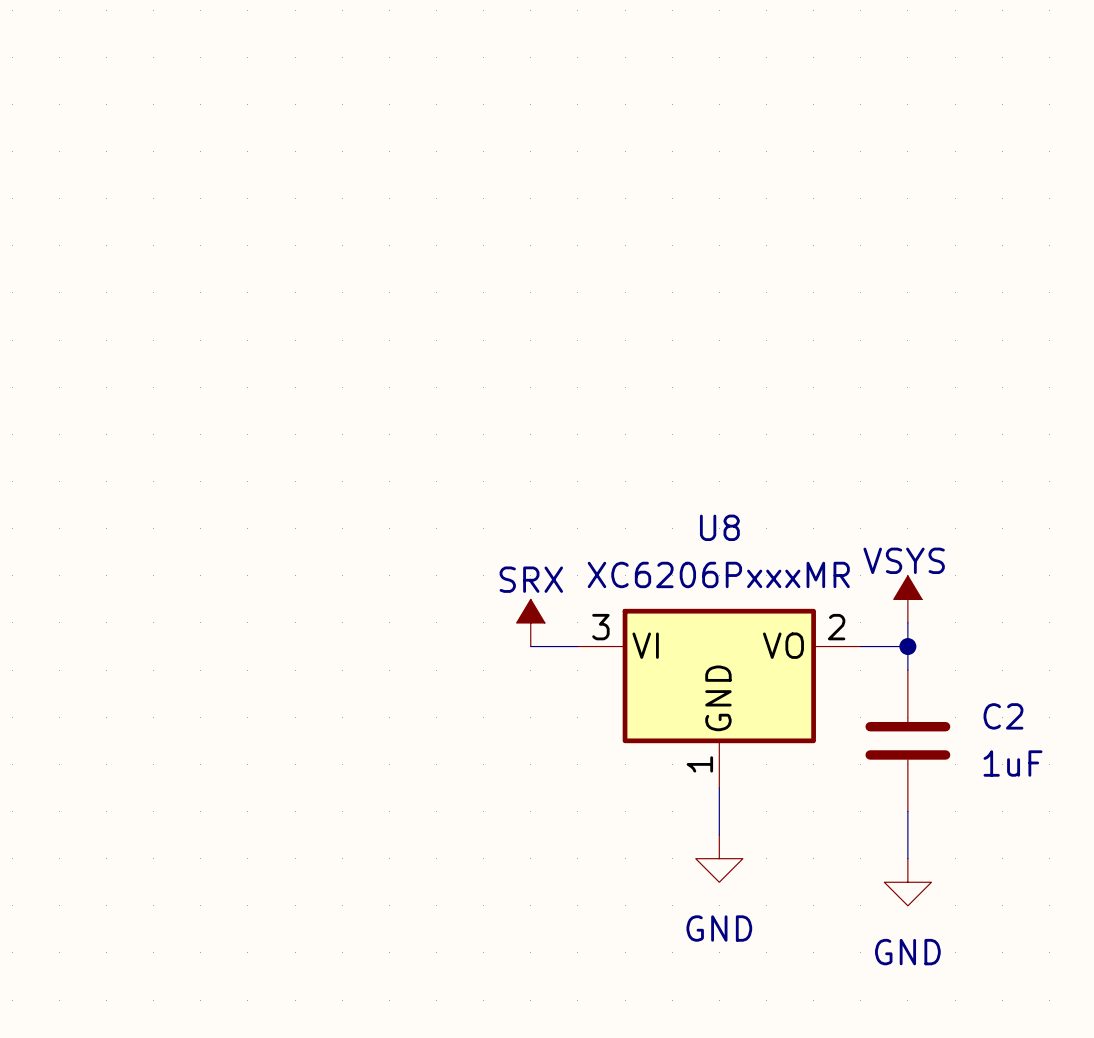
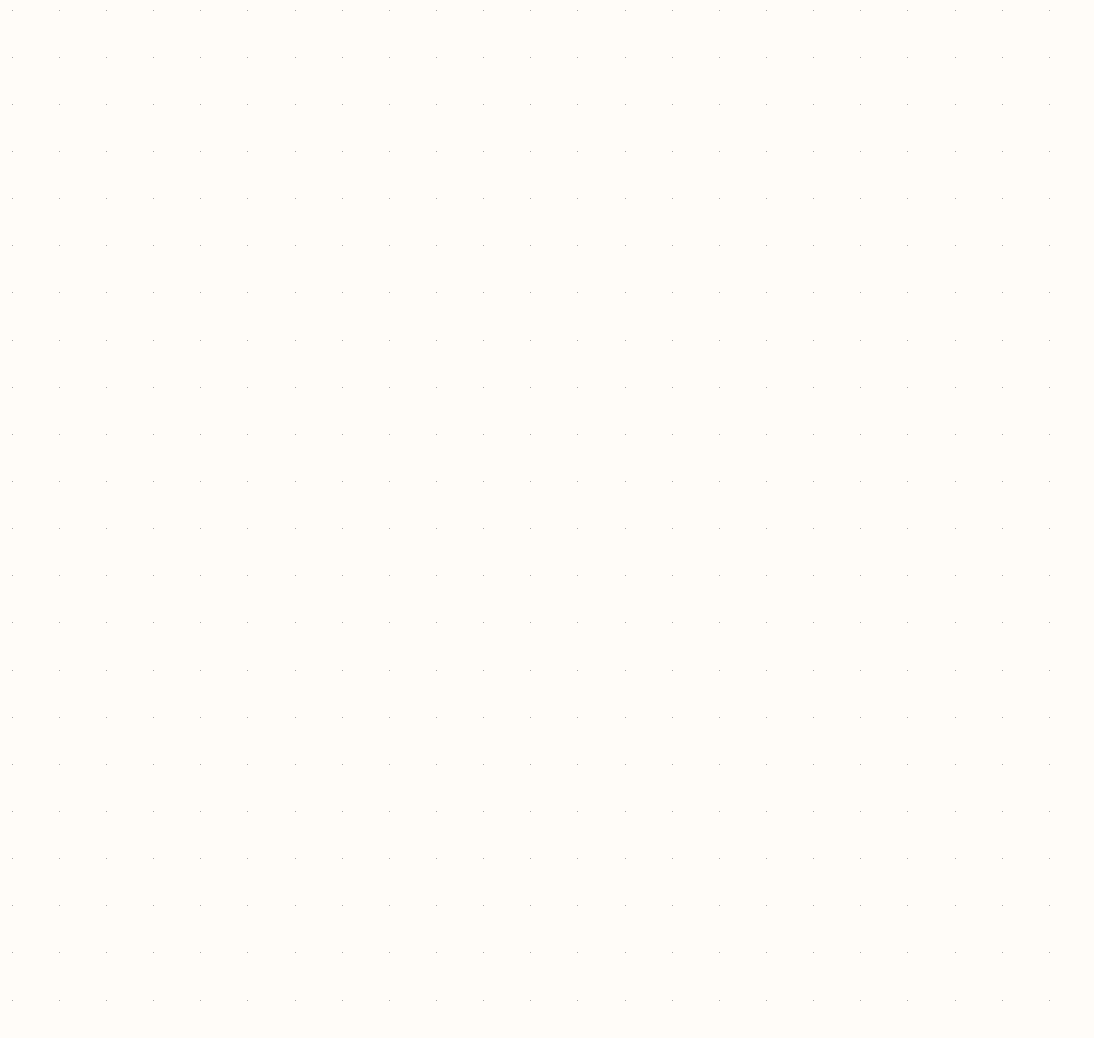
power symbol: VSYS (907, 599) -> none
power symbol: SRX (530, 622) -> none
wire: (907, 622) (907, 670) -> none
wire: (530, 646) (577, 646) -> none
wire: (860, 646) (907, 646) -> none
junction: (907, 646) -> none
U8: XC6206PxxxMR (719, 698) -> none
C2: 1uF (907, 740) -> none
wire: (719, 787) (719, 835) -> none
wire: (907, 811) (907, 858) -> none
power symbol: GND (719, 858) -> none
power symbol: GND (907, 882) -> none

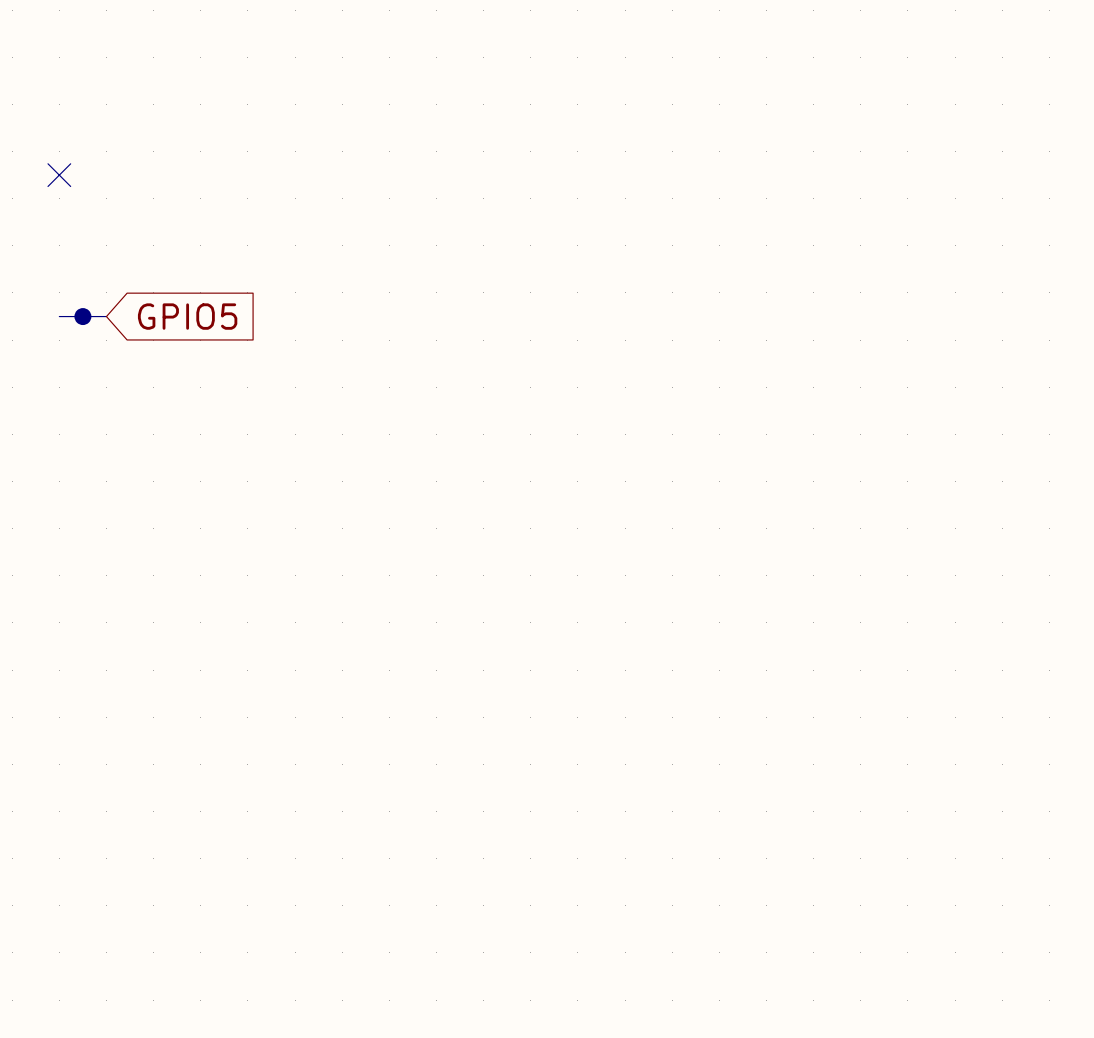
no-connect mark: none -> (59, 175)
wire: none -> (59, 316) (106, 316)
junction: none -> (82, 316)
global label: none -> GPIO5 (187, 316)

